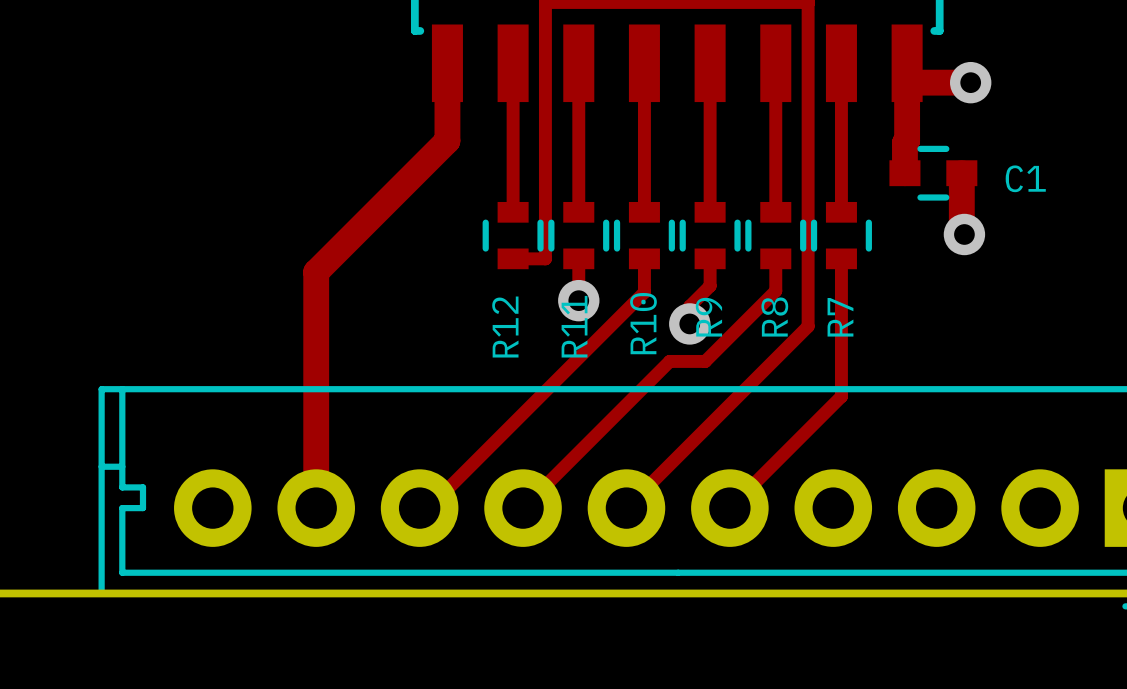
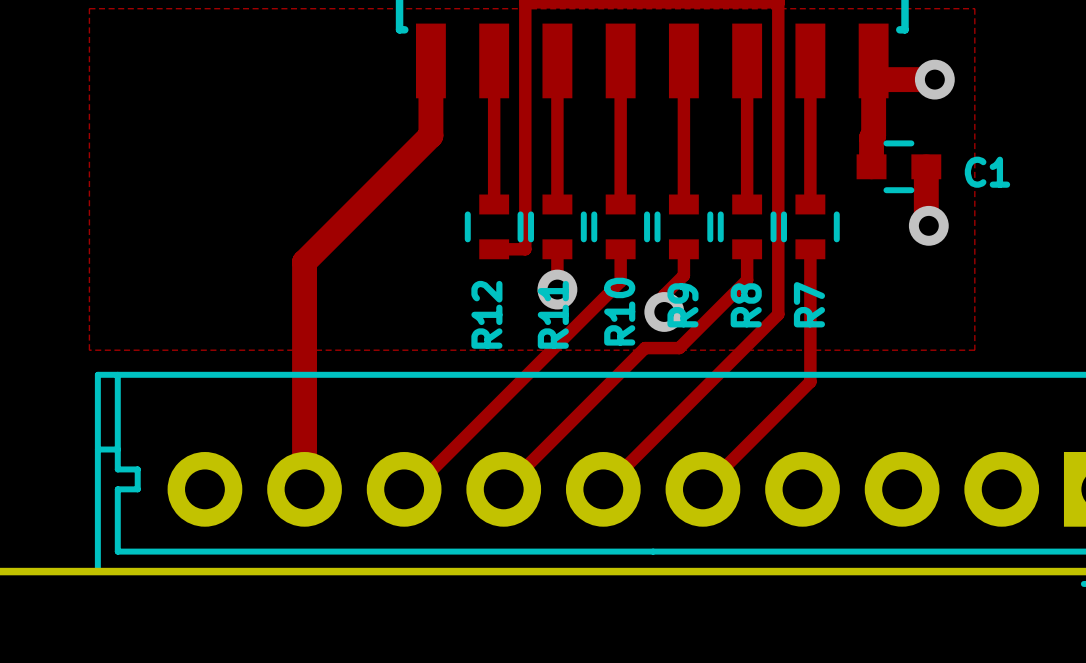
zone outline: none -> (89, 8) (974, 8) (974, 350) (89, 350) (89, 8)

